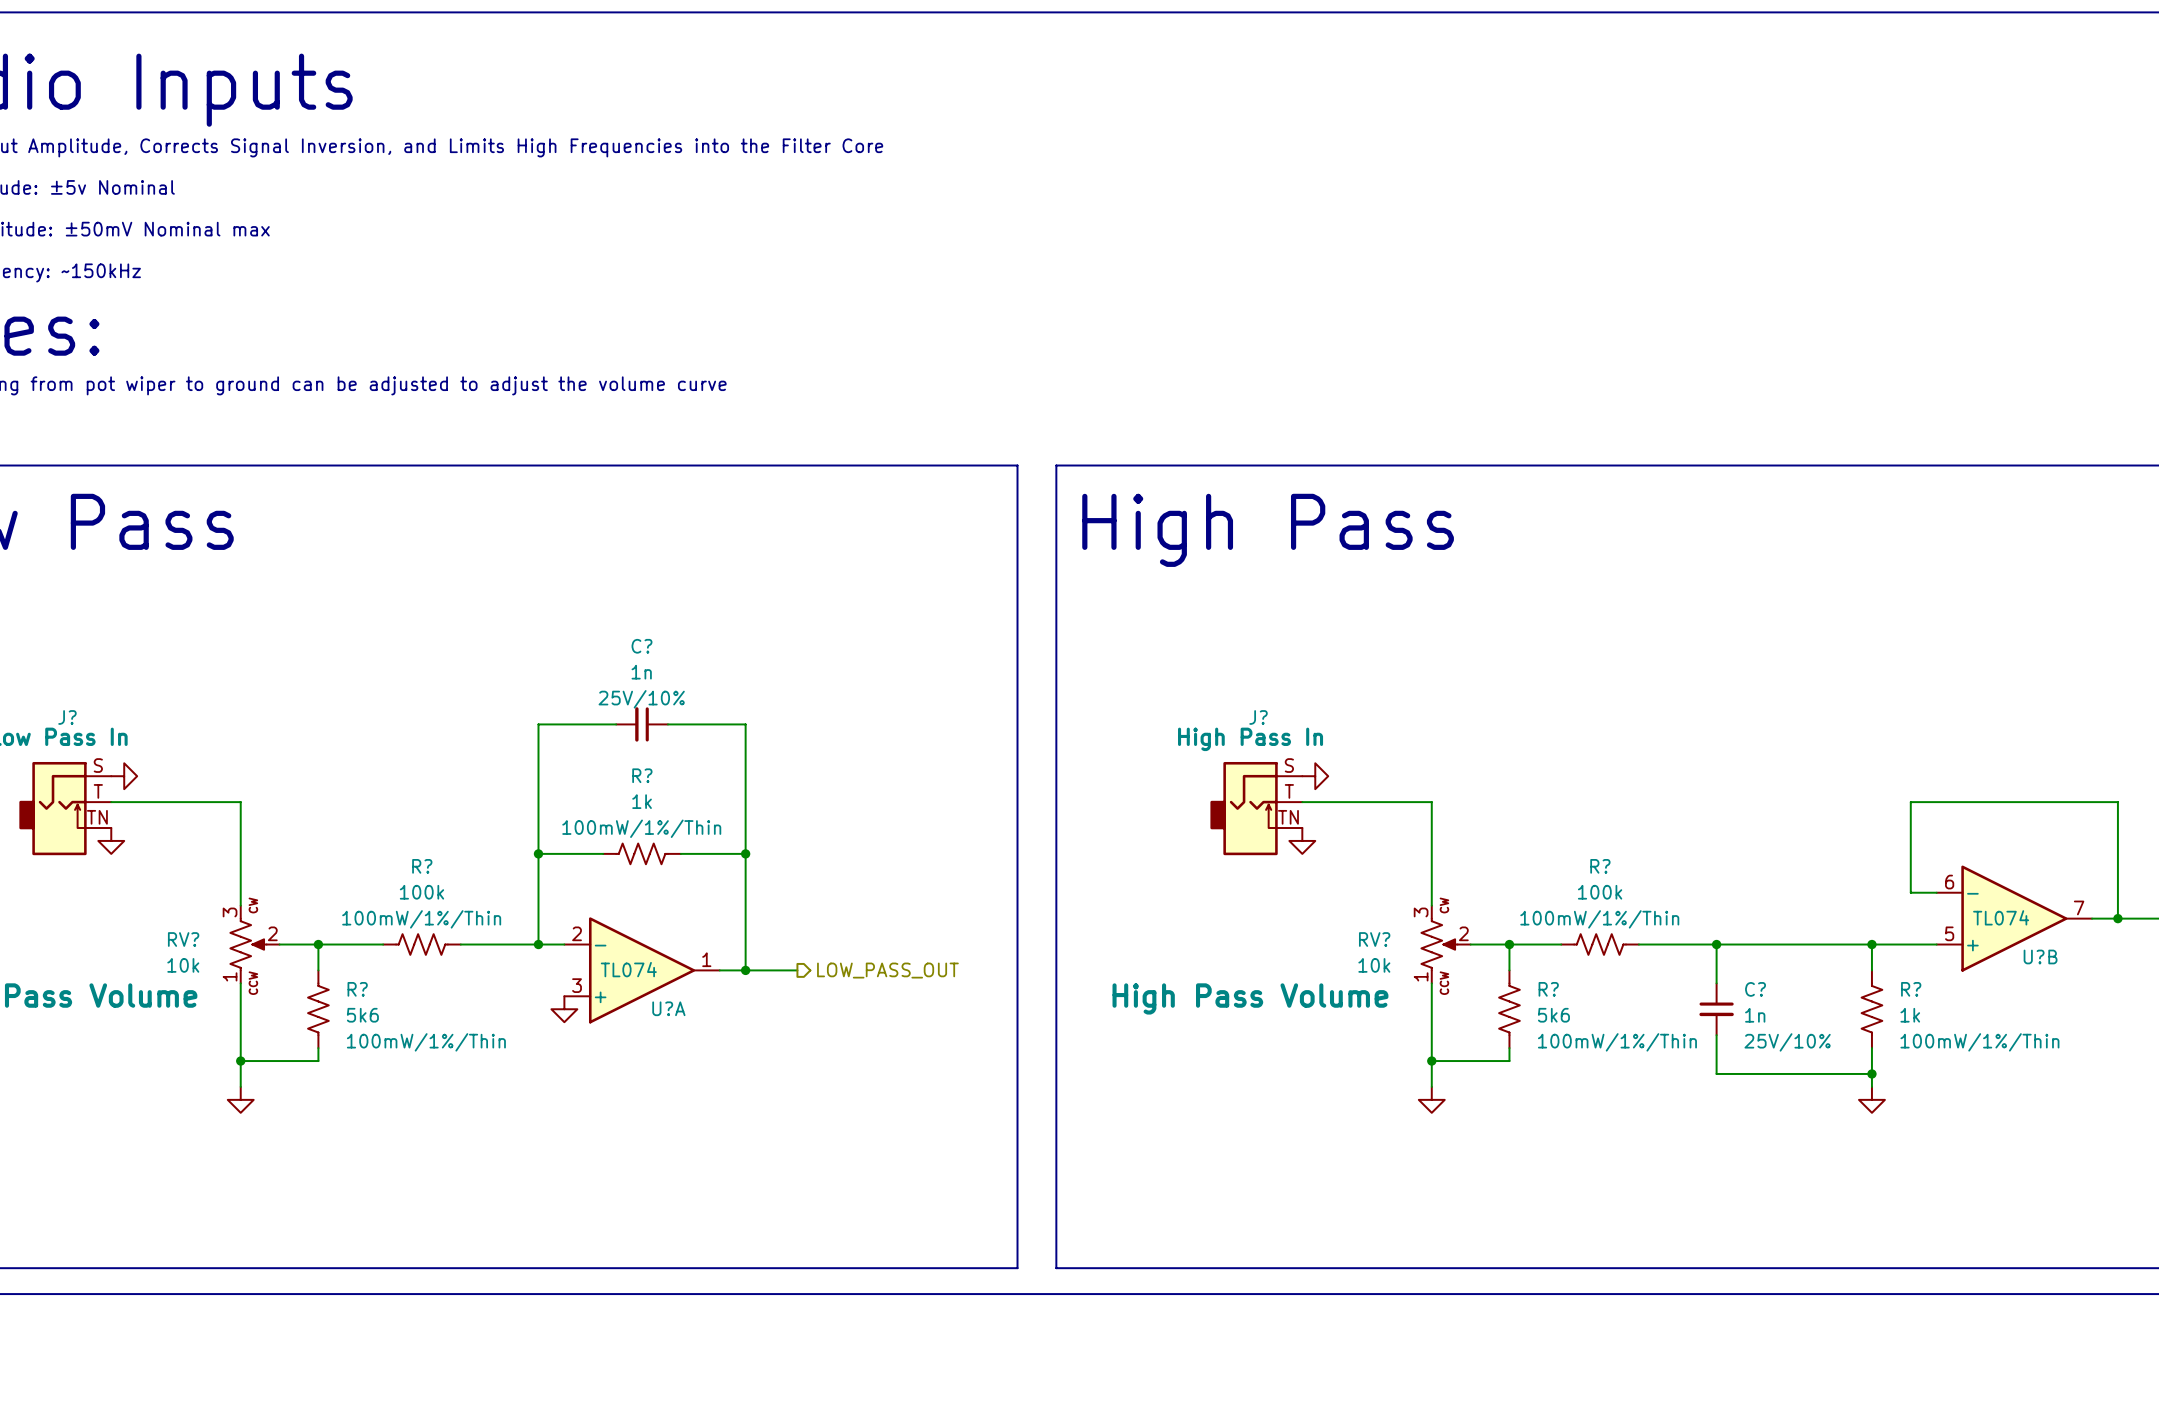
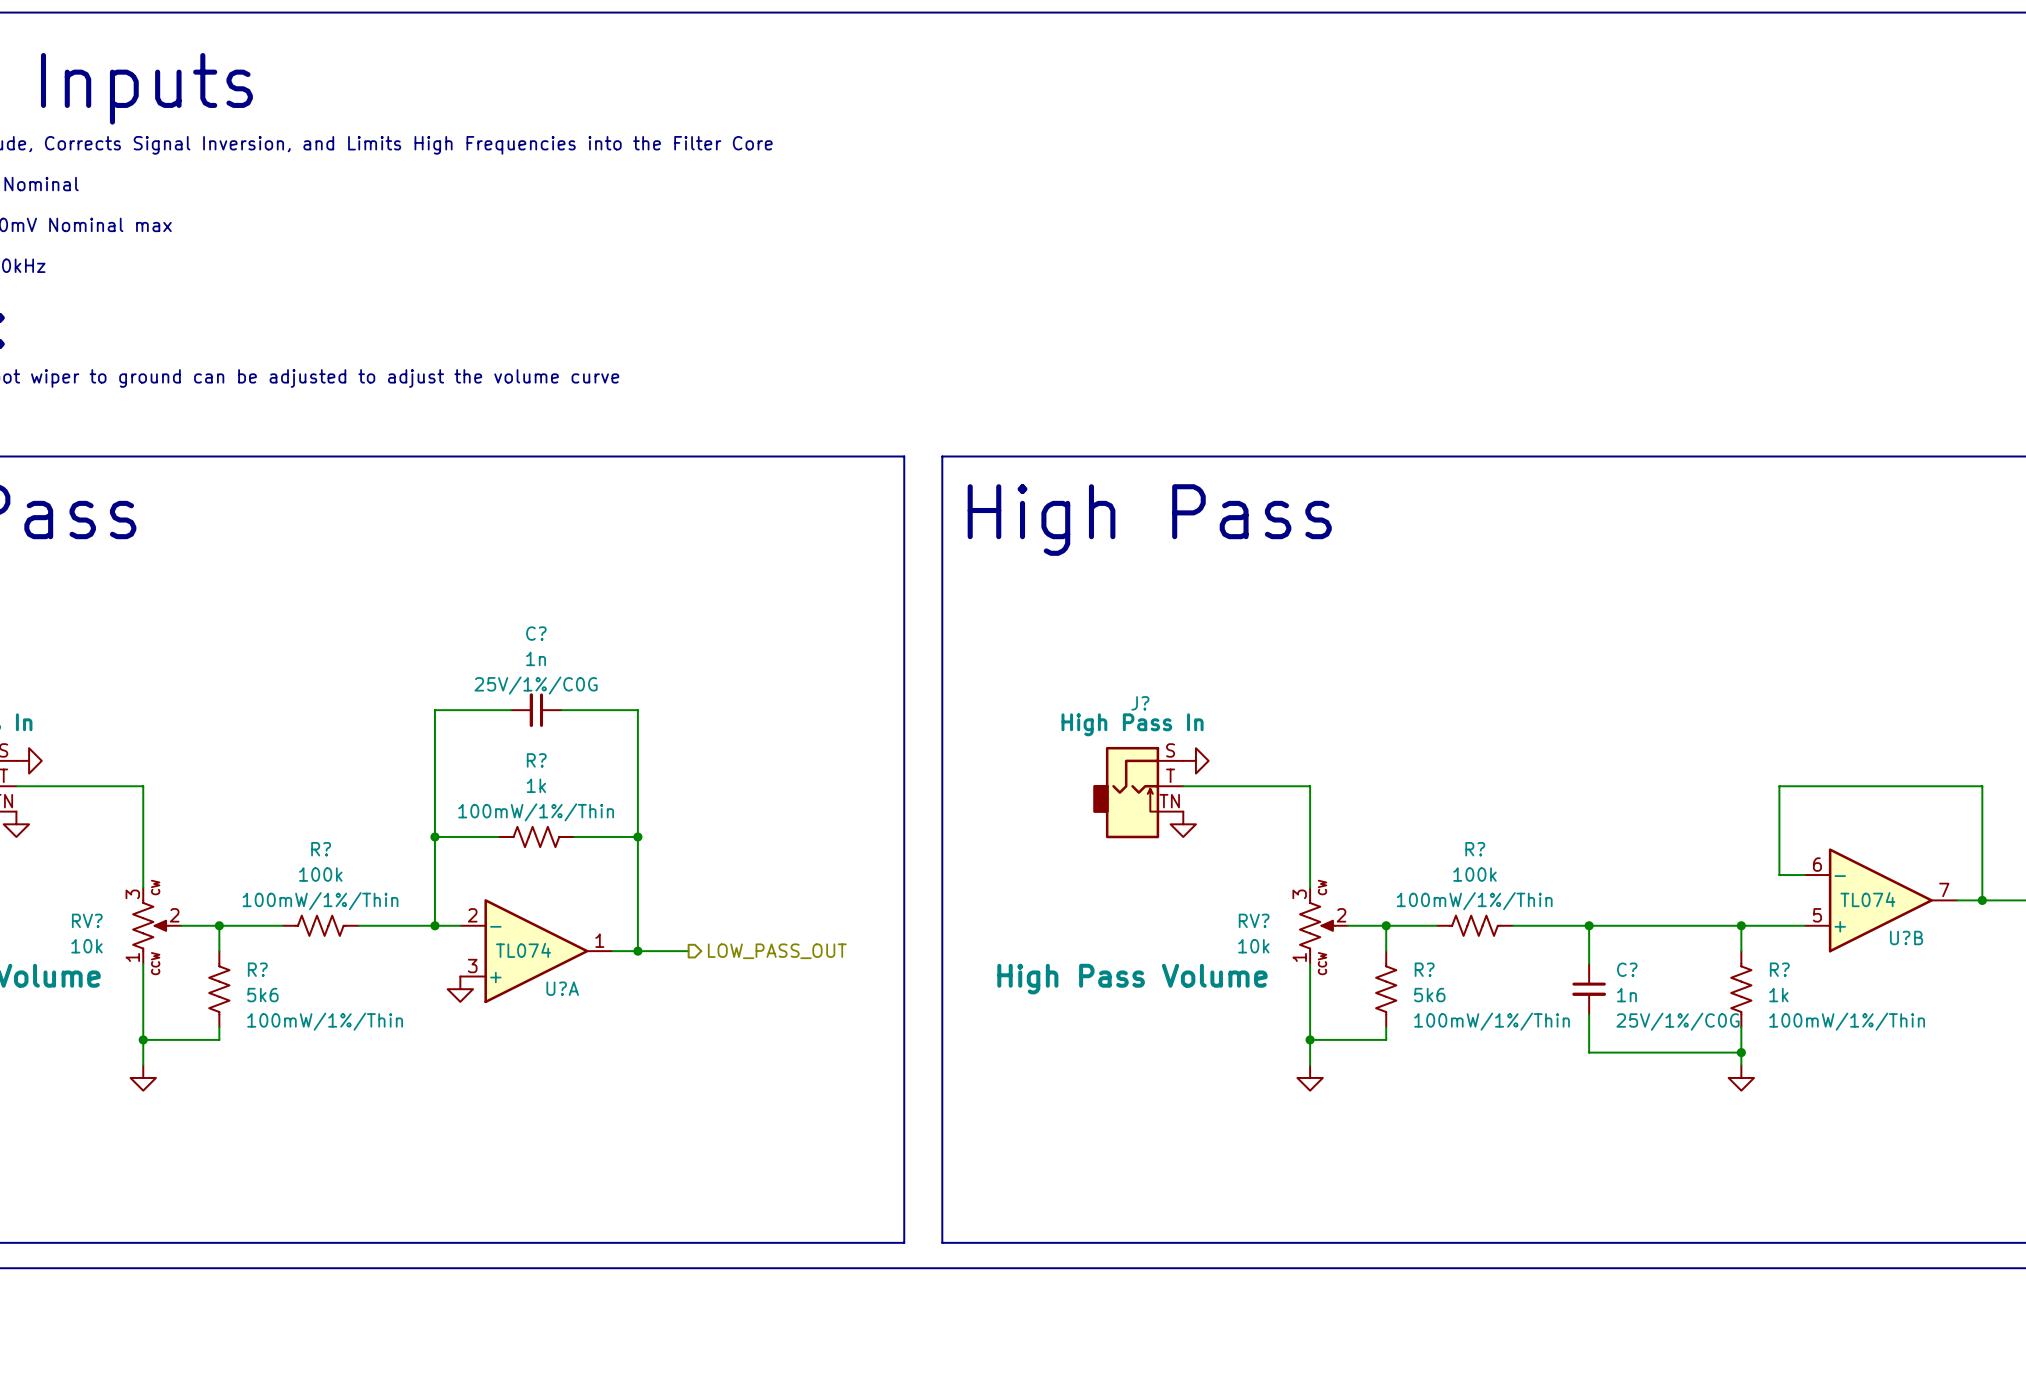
C? text: 25V/10% (641, 699) -> 25V/1%/C0G (536, 685)
C? text: 25V/10% (1787, 1042) -> 25V/1%/C0G (1678, 1021)

